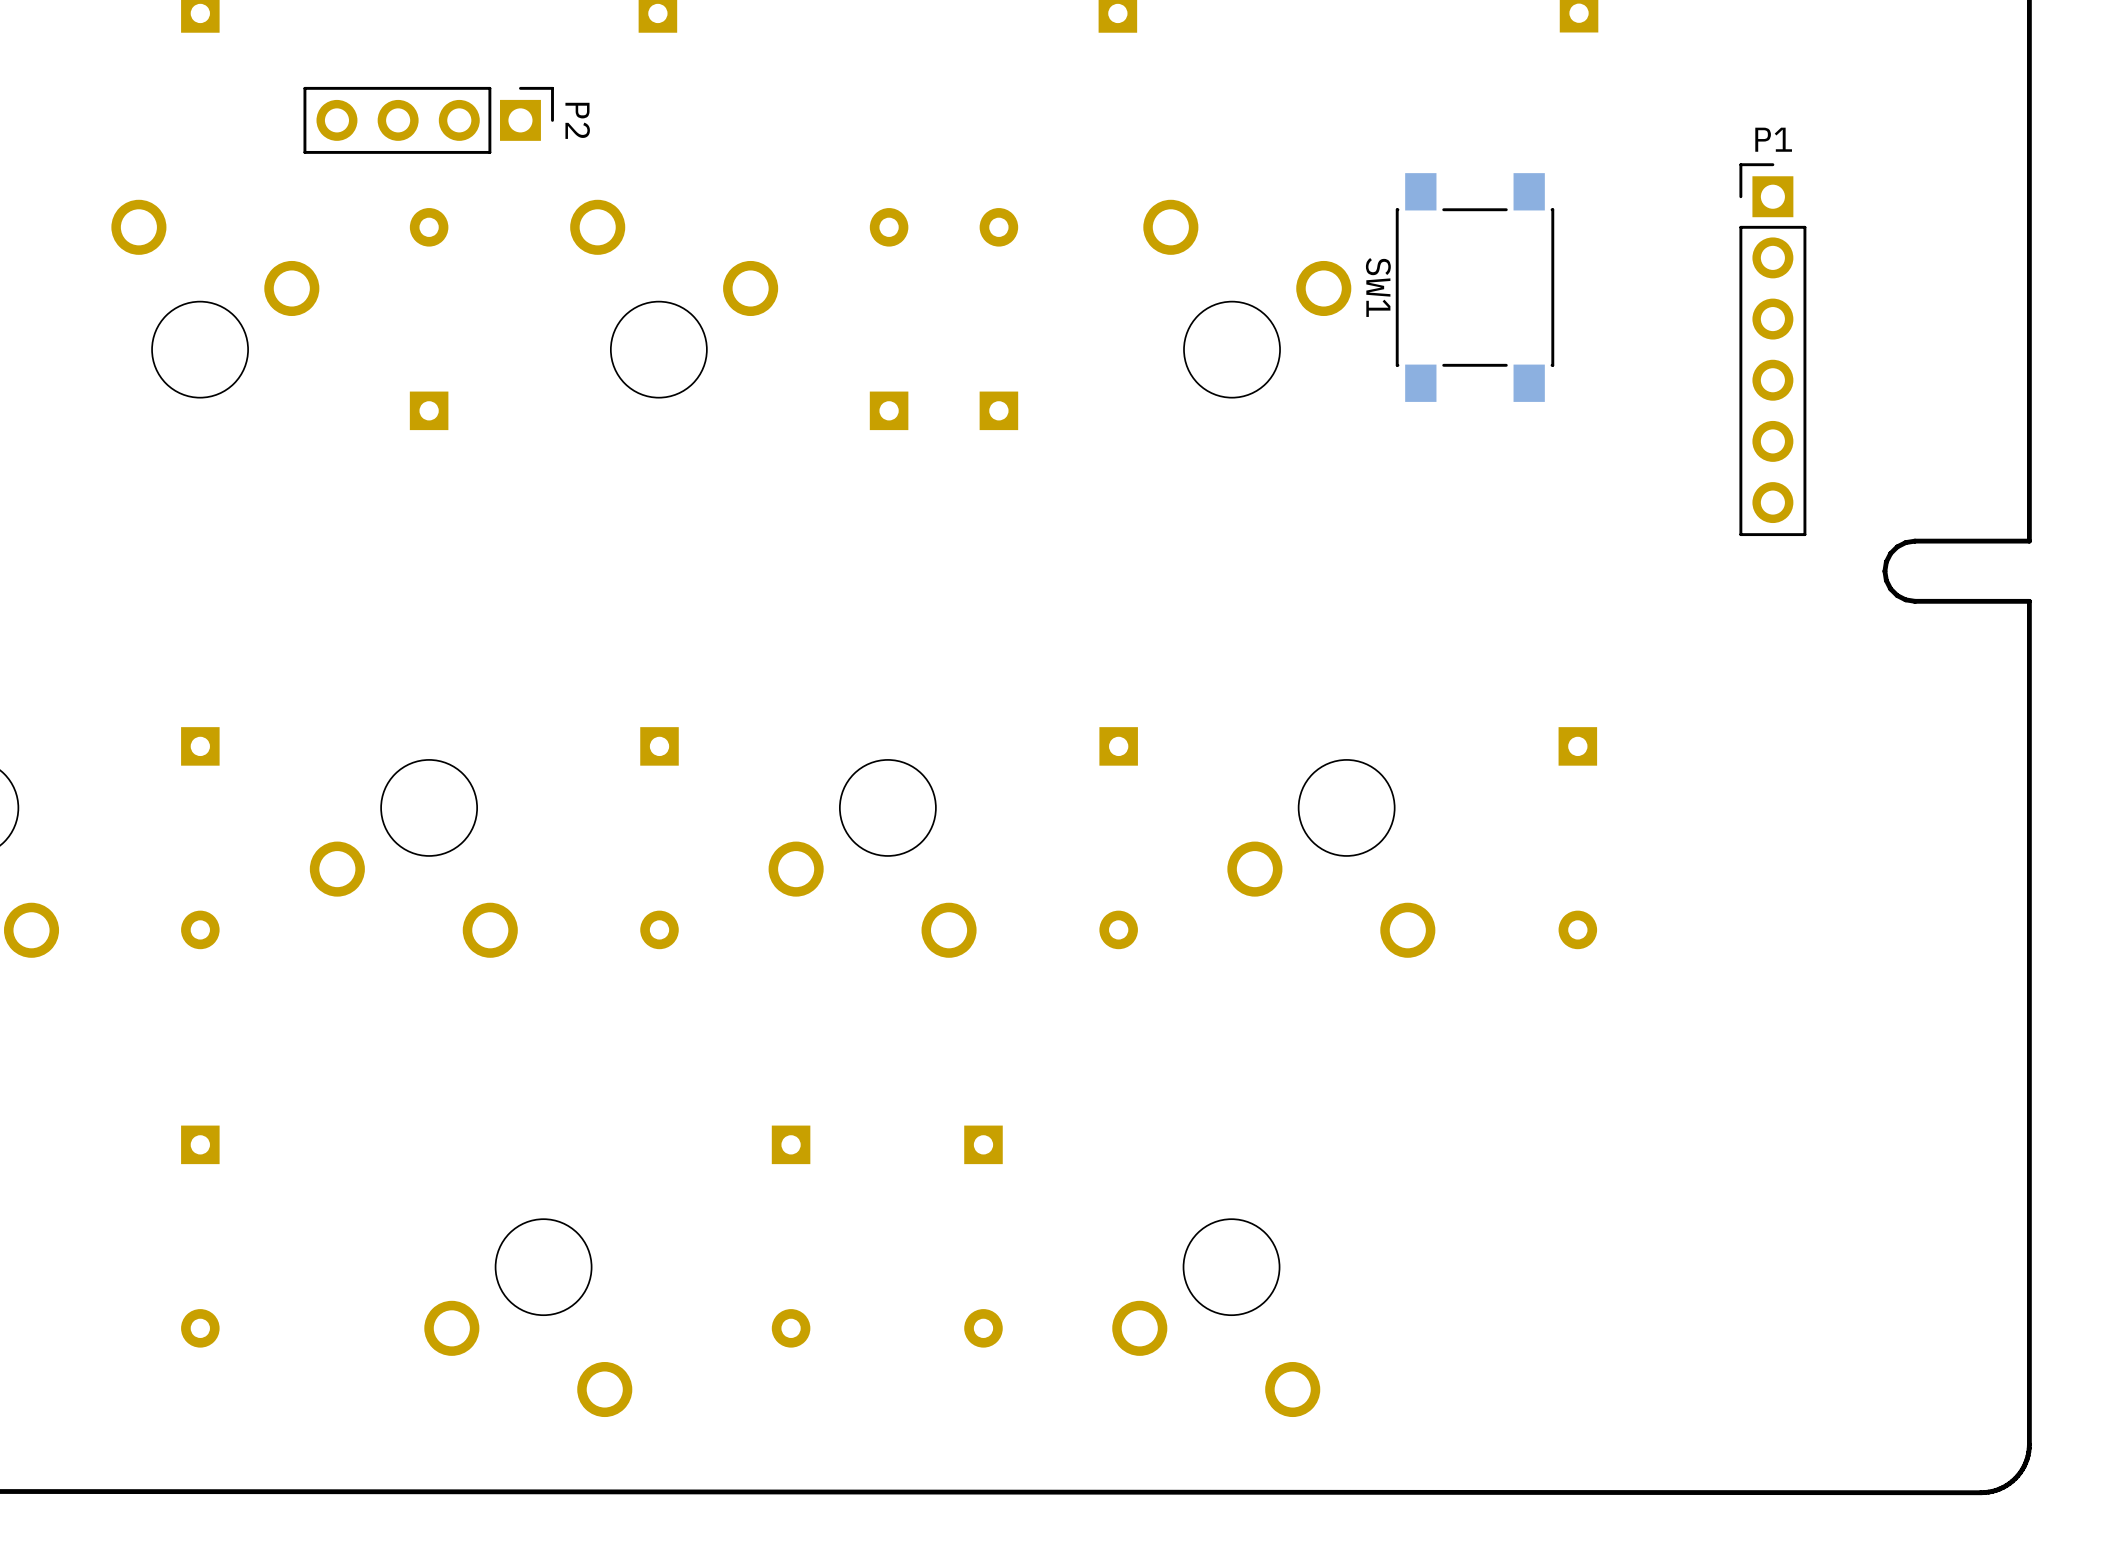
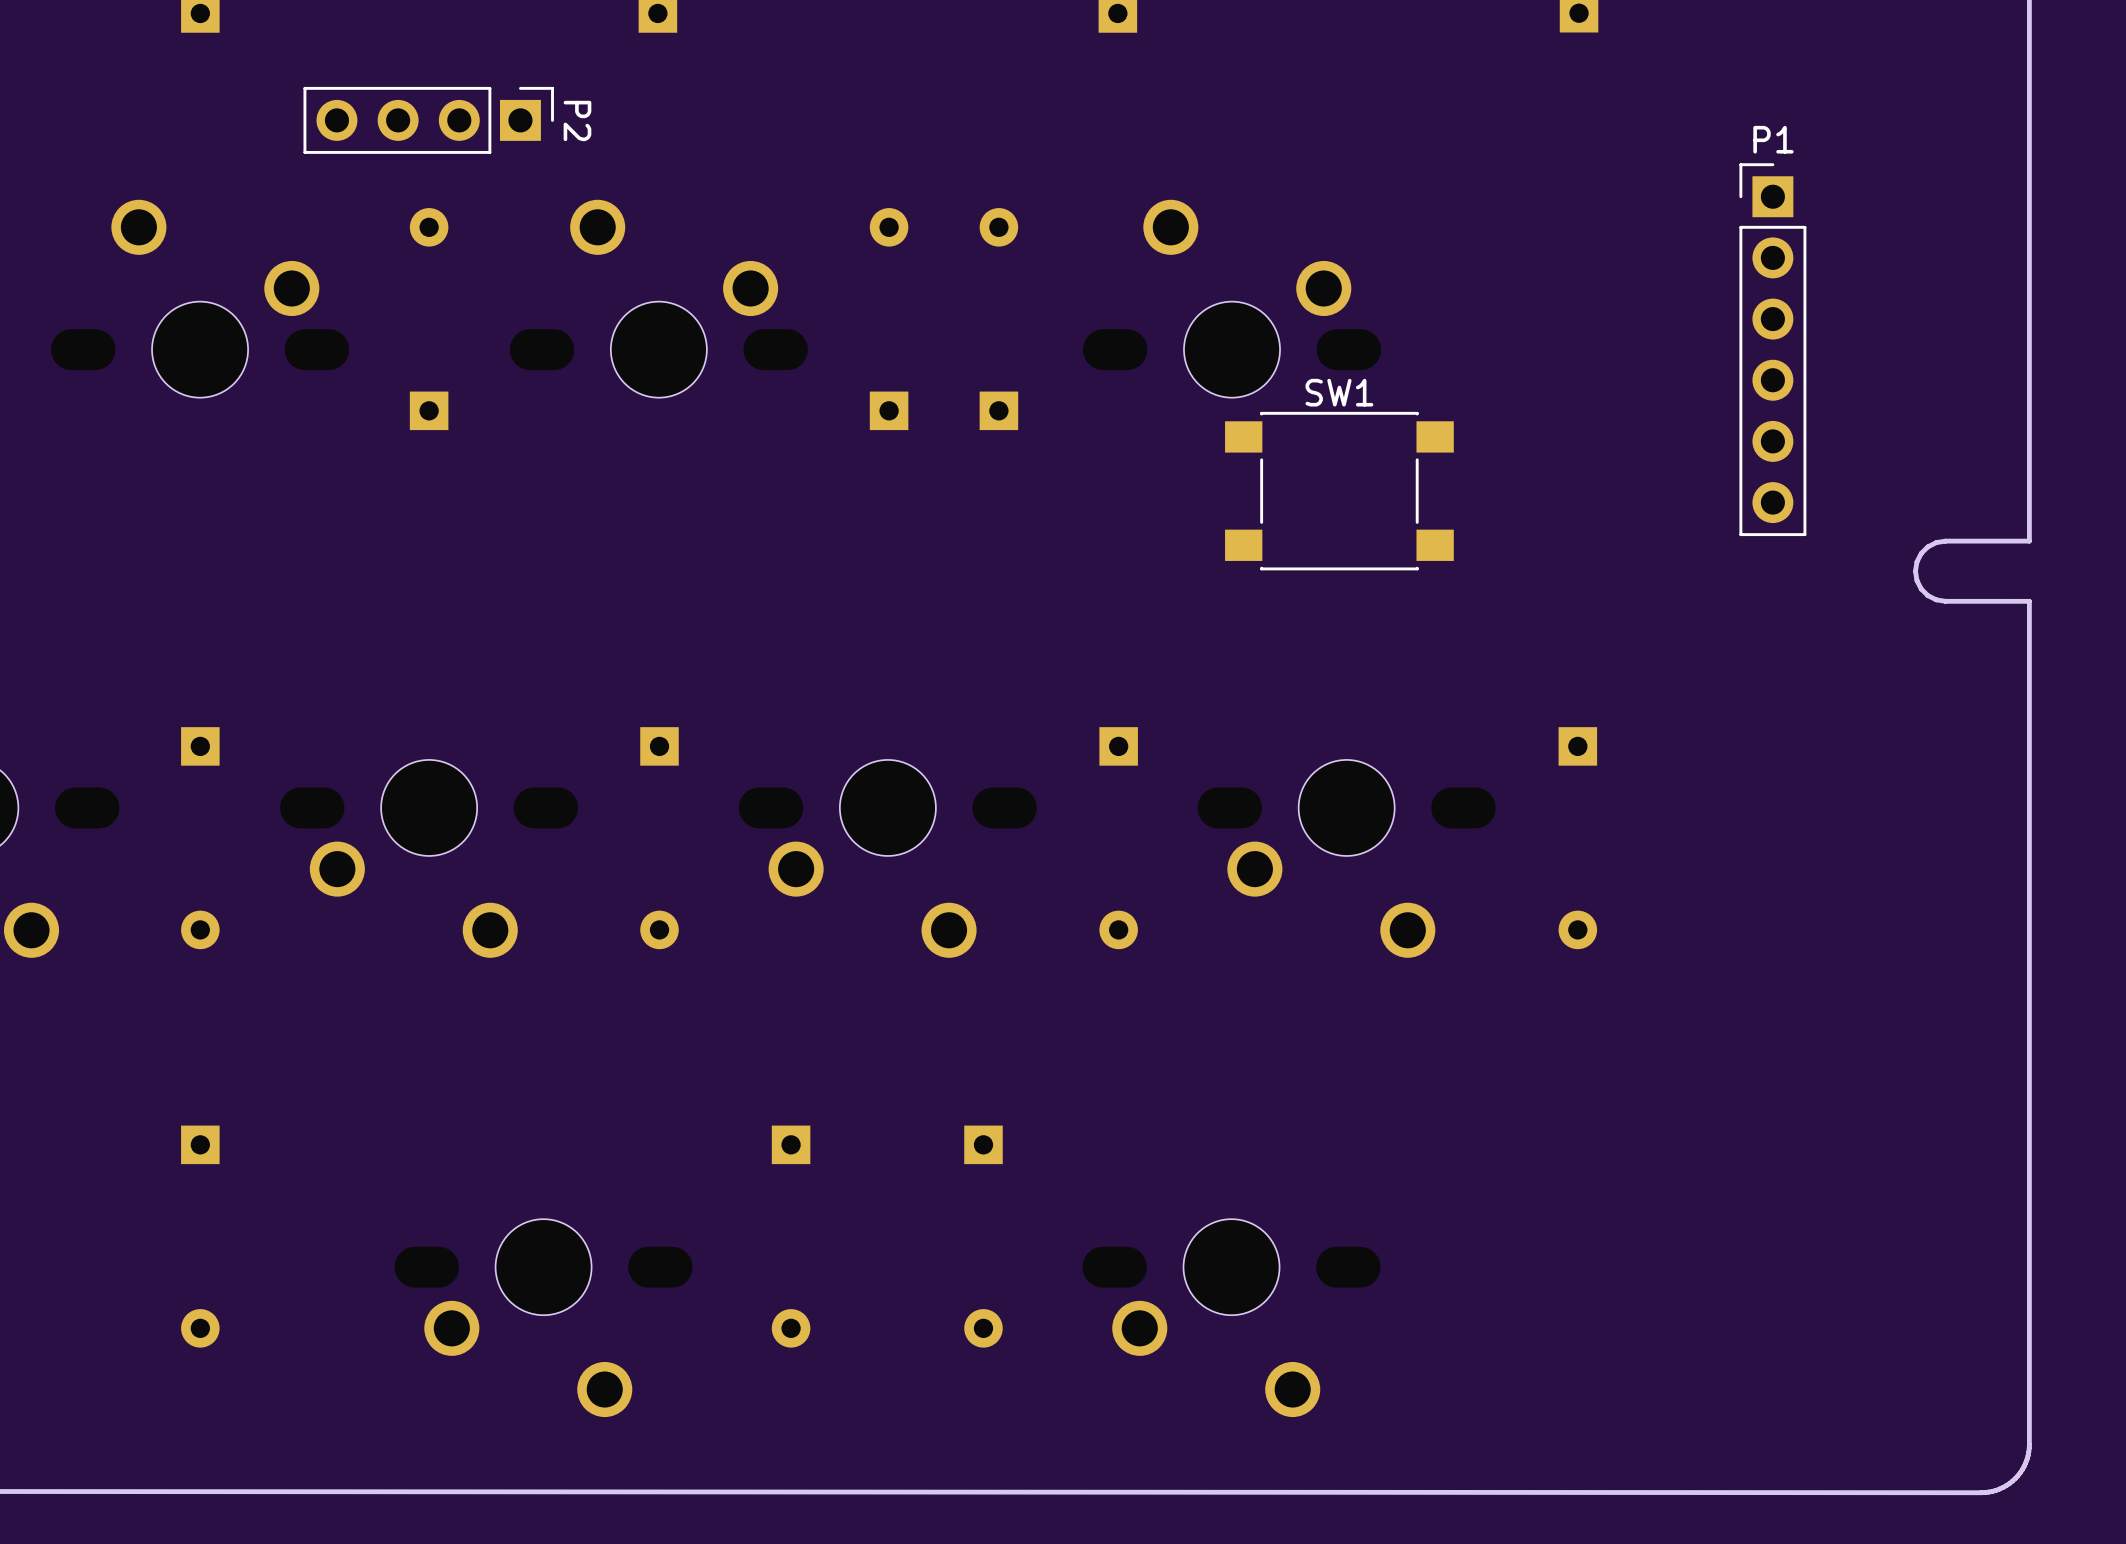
SW1 rotation: 0° (1475, 287) -> 90° clockwise (1339, 491)
SW1 position: (1475, 287) -> (1339, 491)
board edge: (1945, 541) (1914, 541) (1897, 546) (1886, 561) (1886, 580) (1890, 588) (1905, 599) (1914, 601) (2029, 601) -> (1945, 541) (1927, 546) (1916, 561) (1916, 580) (1927, 595) (1945, 601) (2029, 601)

